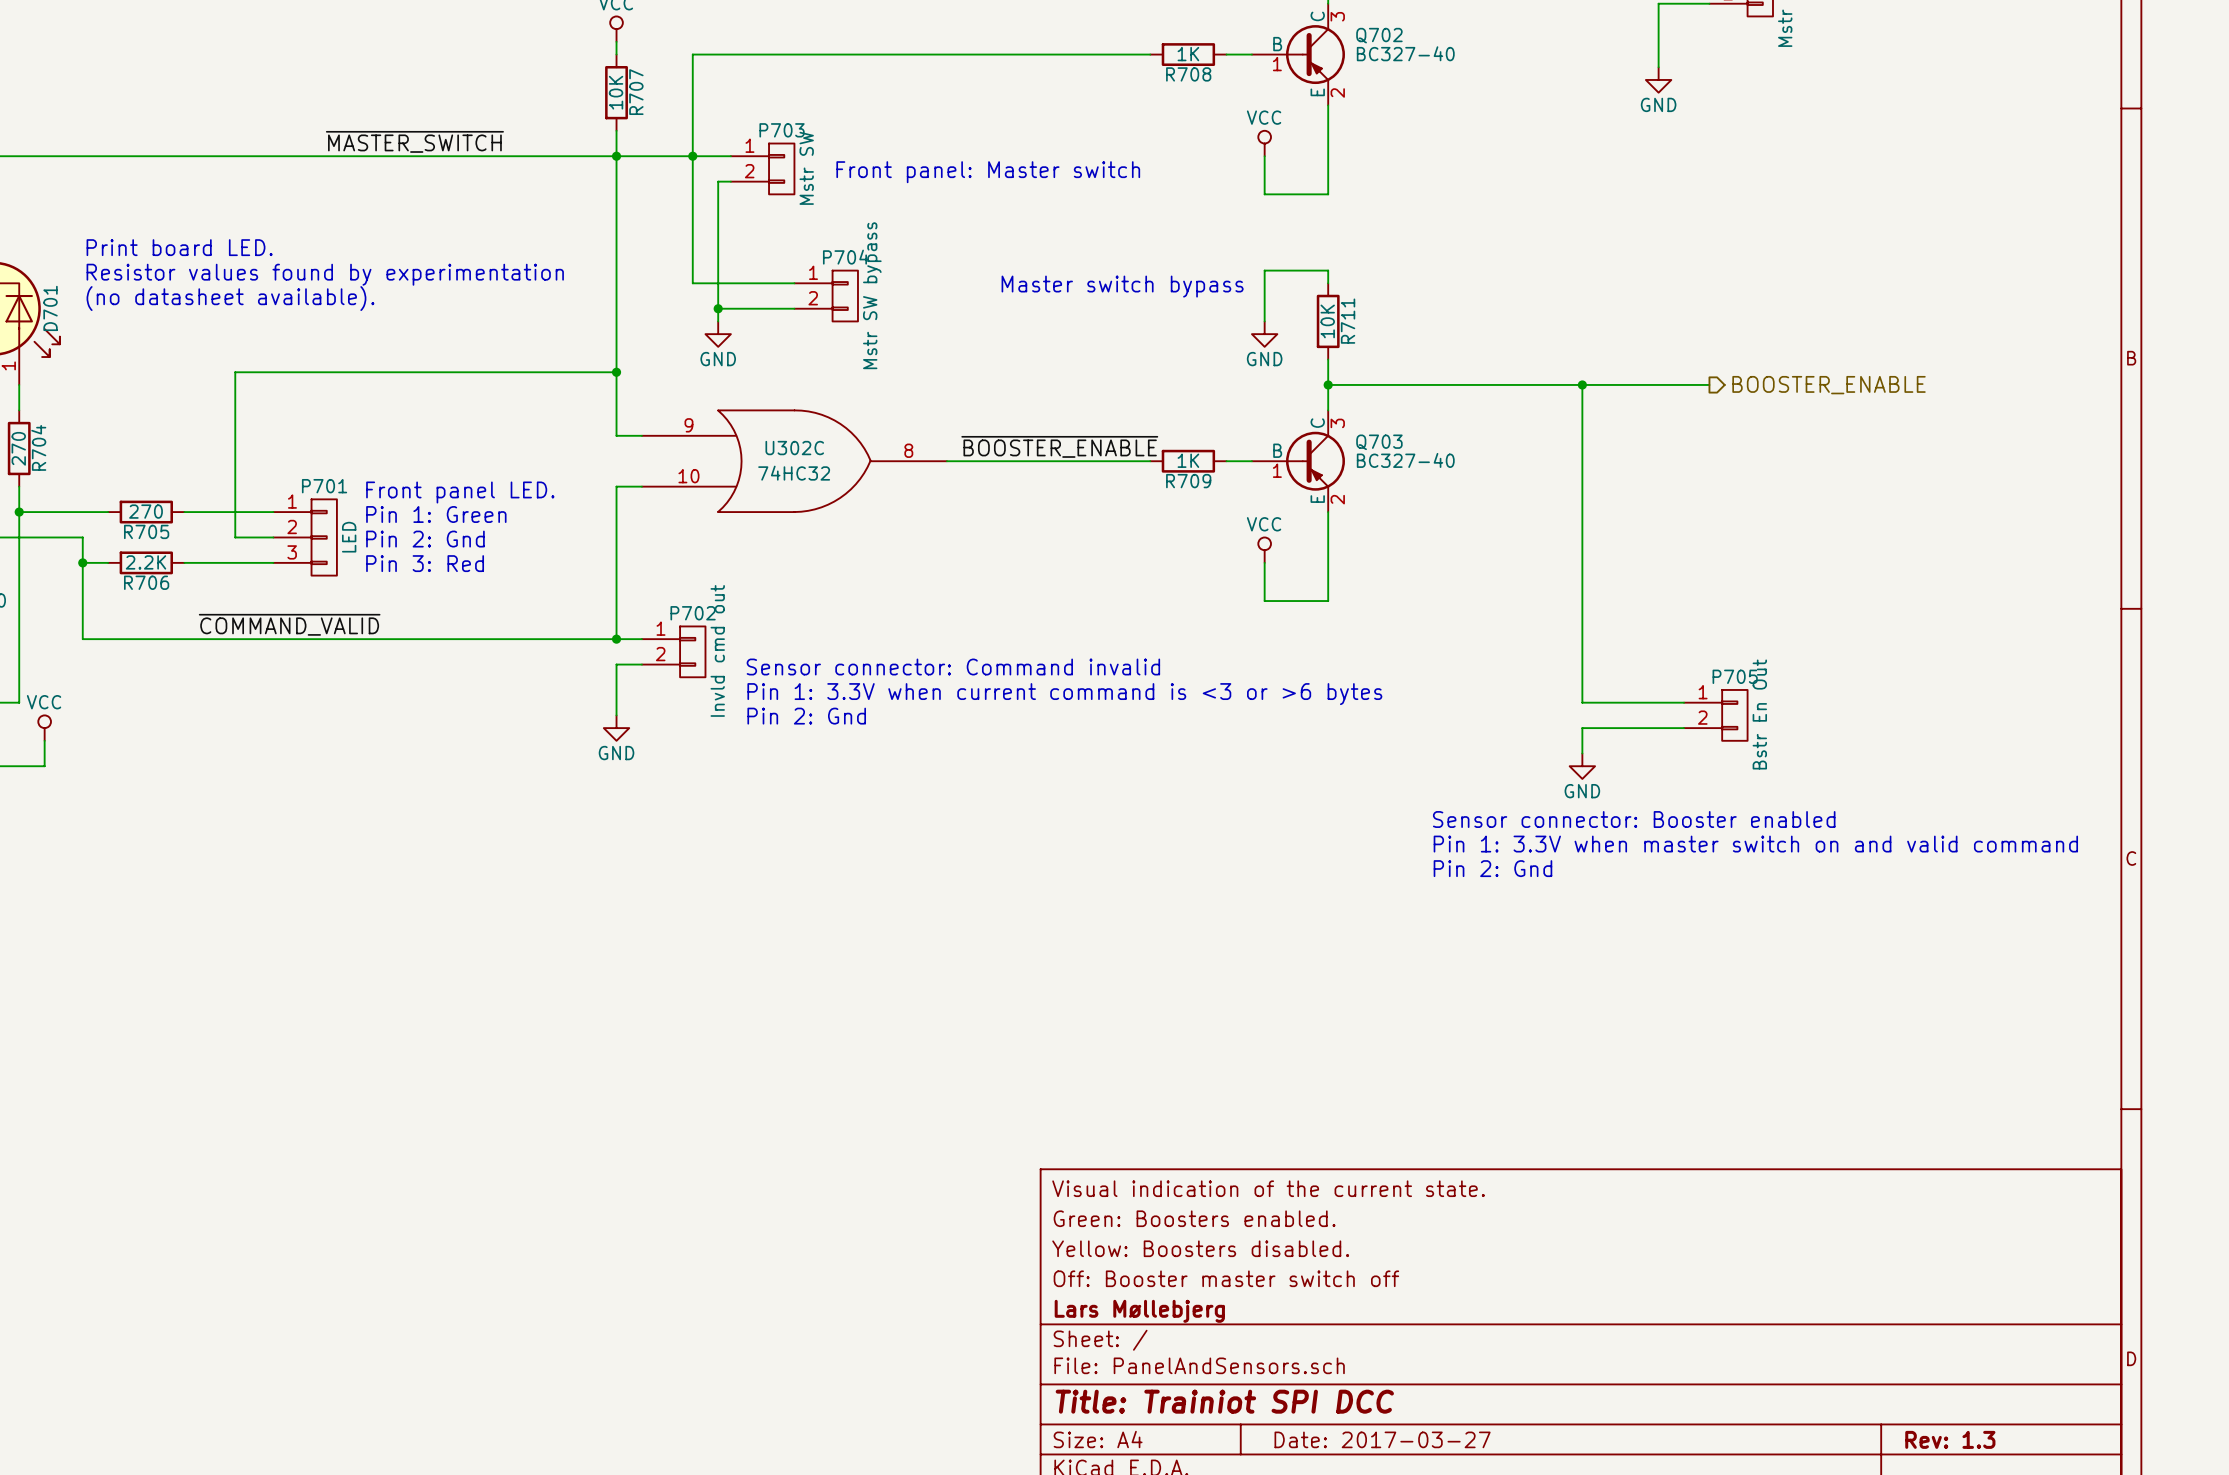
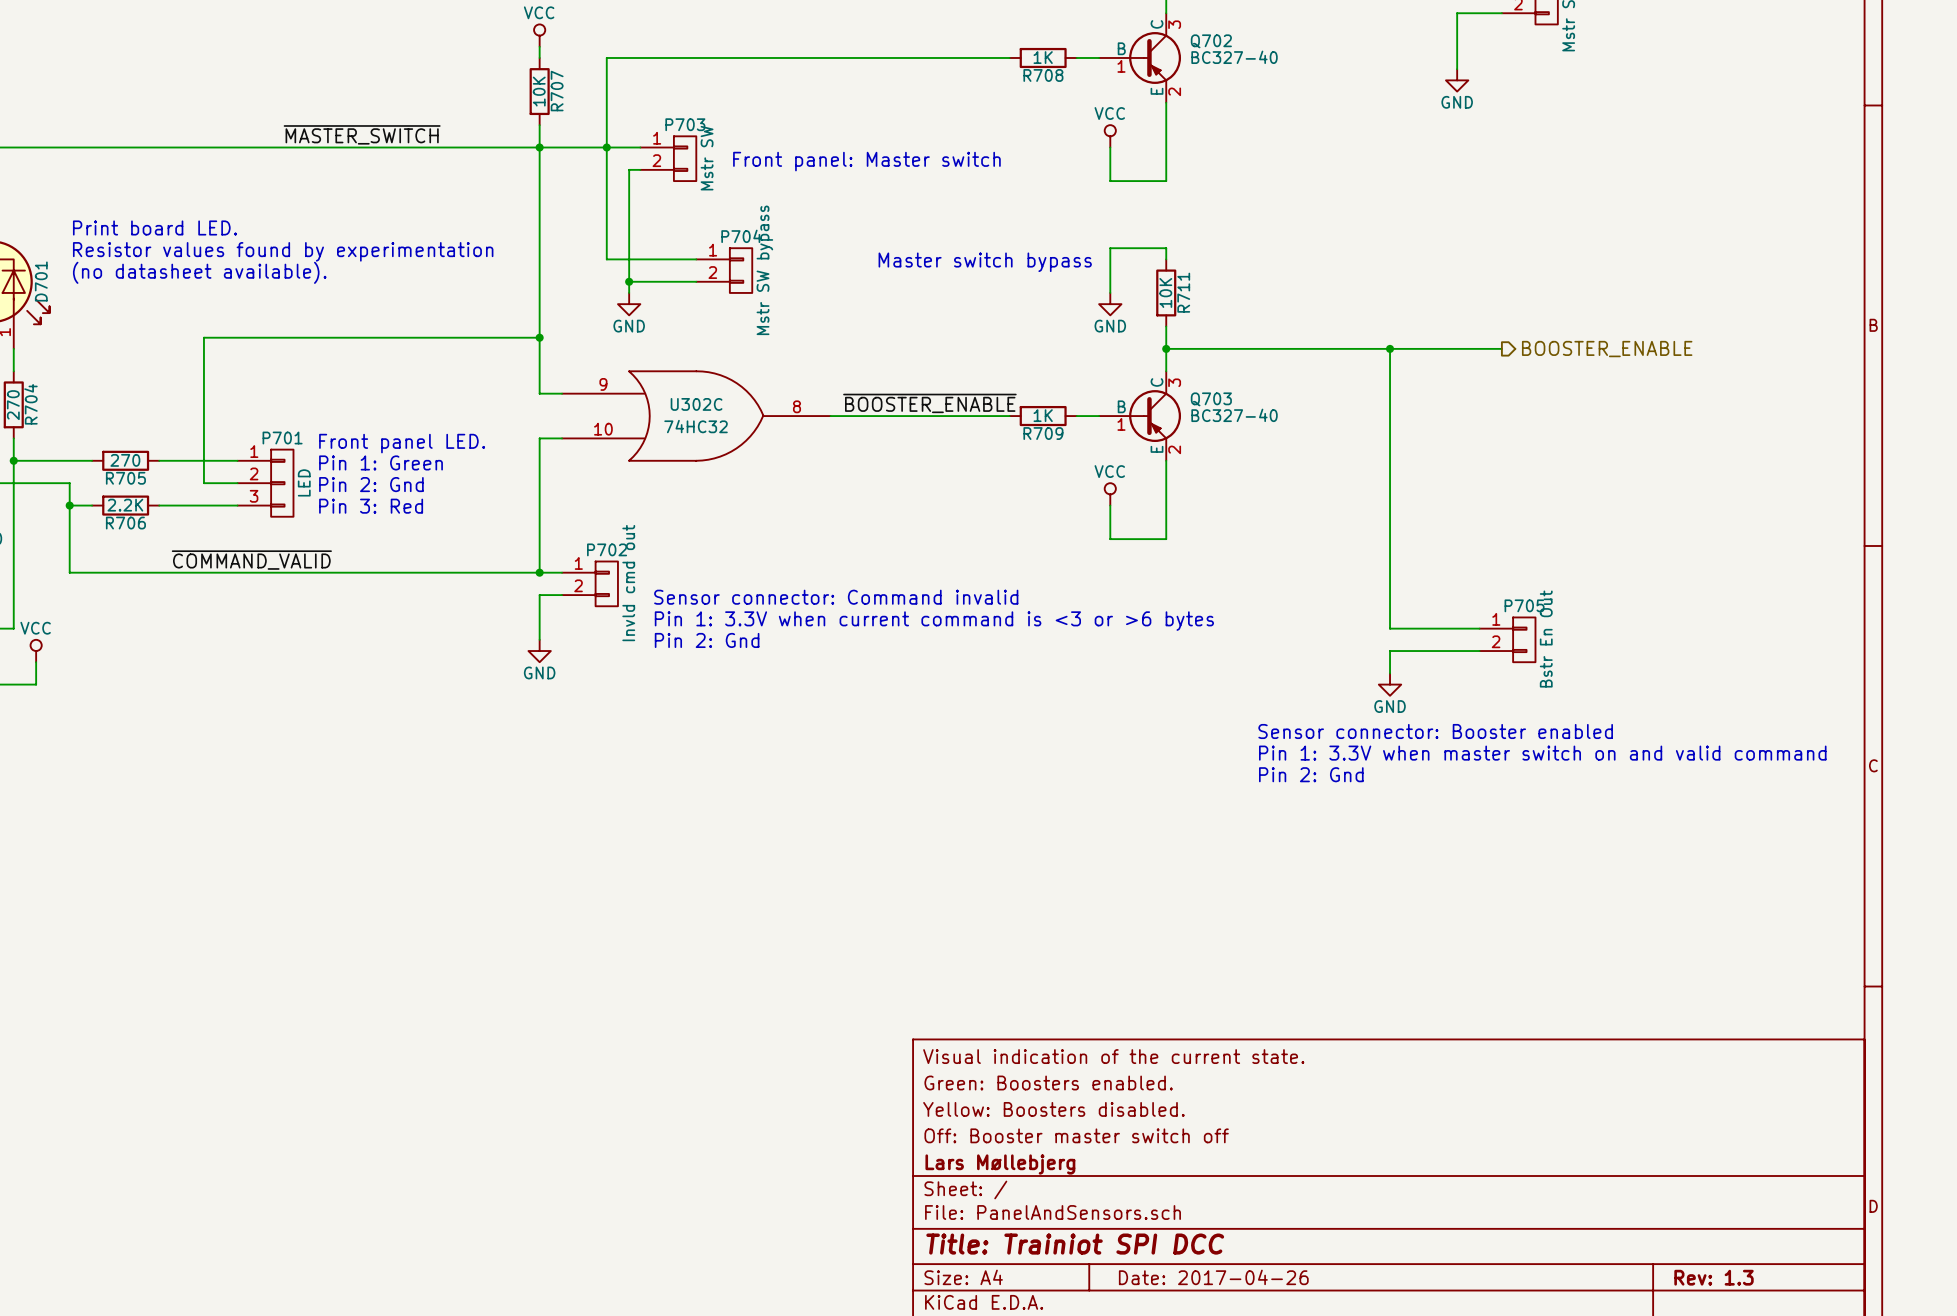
title block: Date: 2017-03-27 (1382, 1439) -> Date: 2017-04-26 (1213, 1277)

